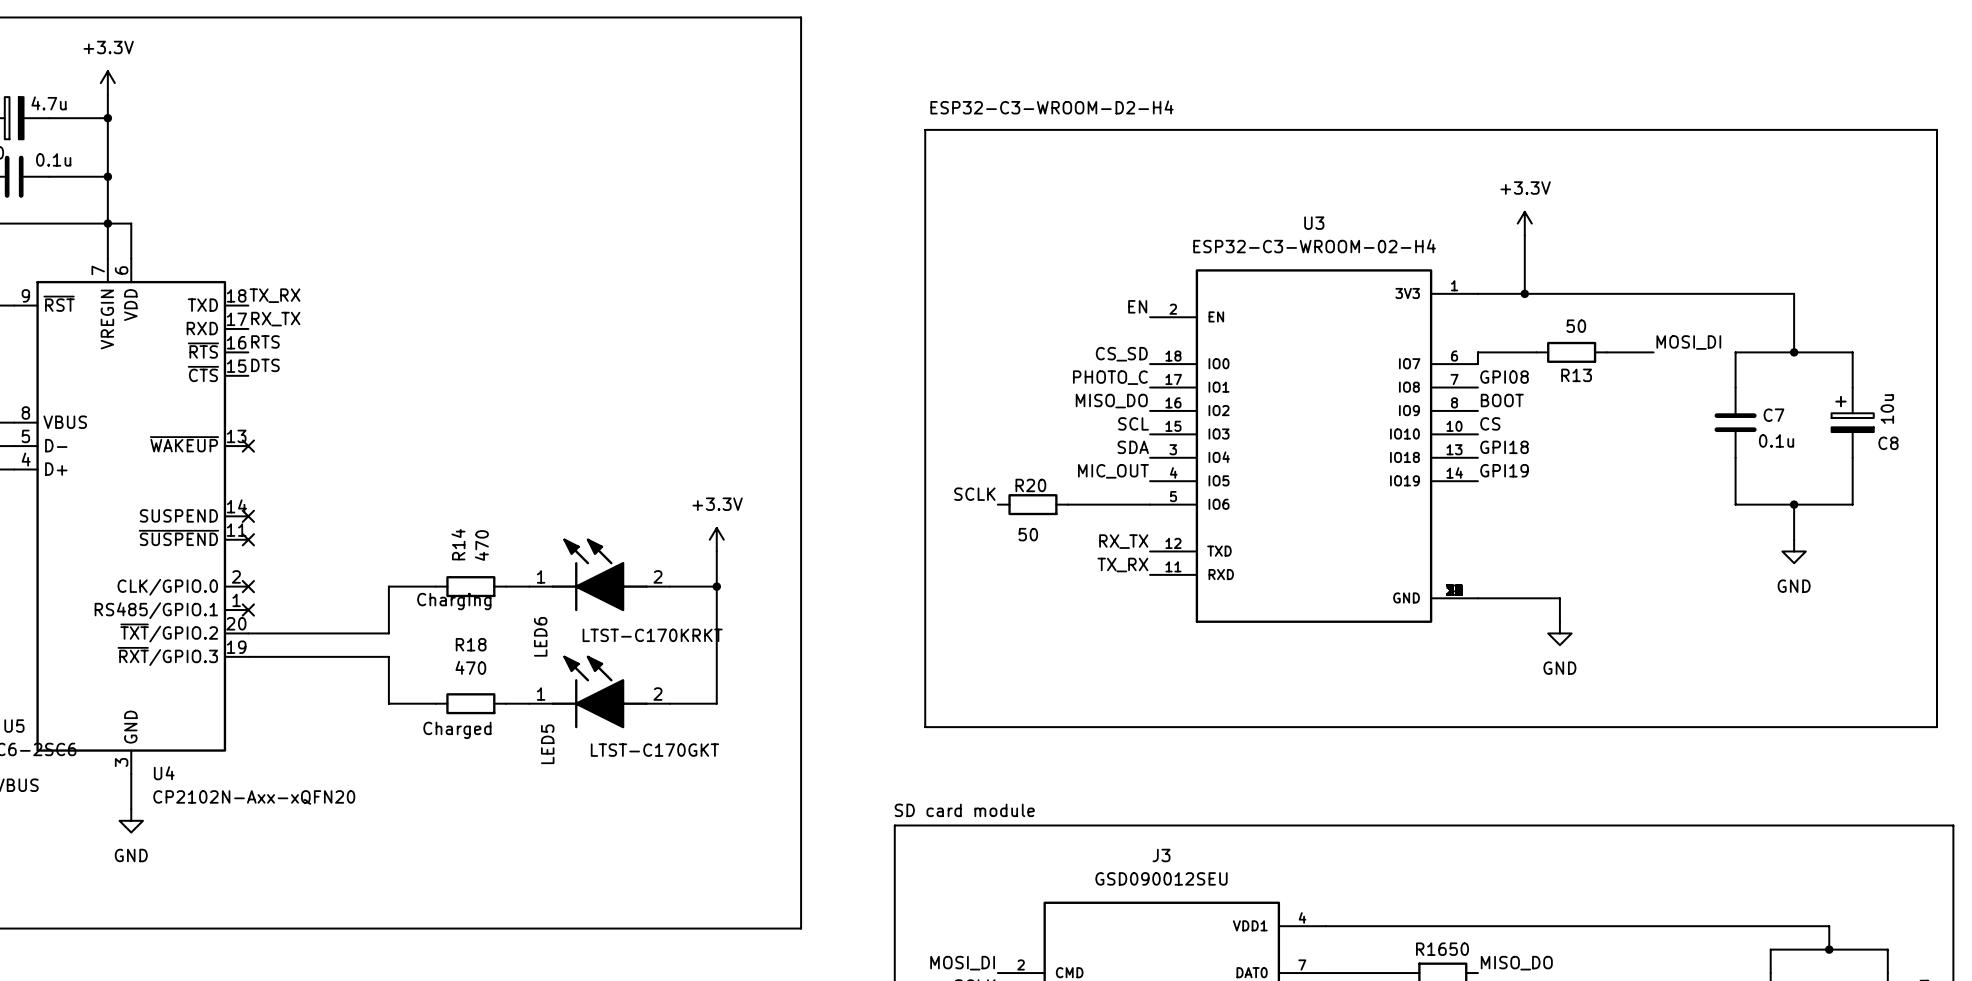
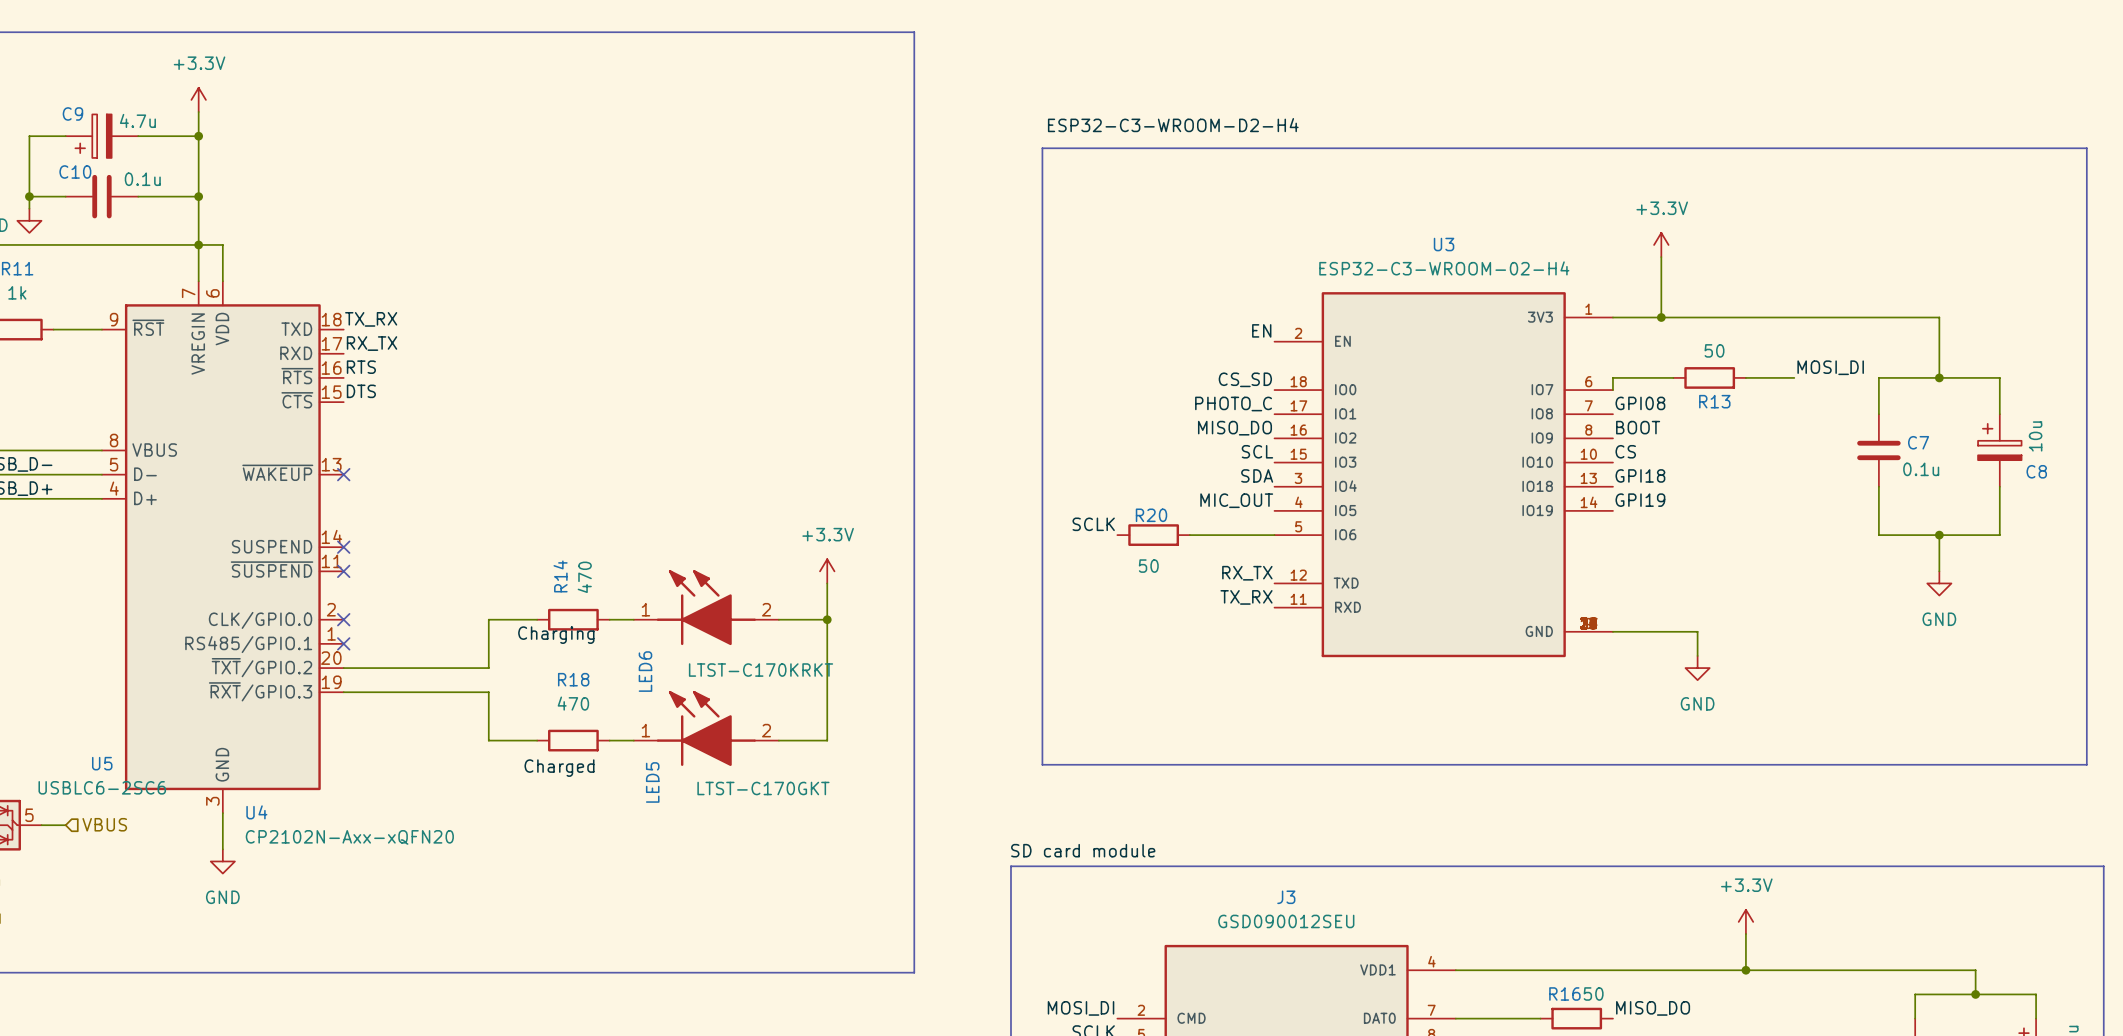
power symbol: none -> +3.3V (1745, 921)
wire: none -> (1745, 934) (1745, 970)
junction: none -> (1745, 970)

